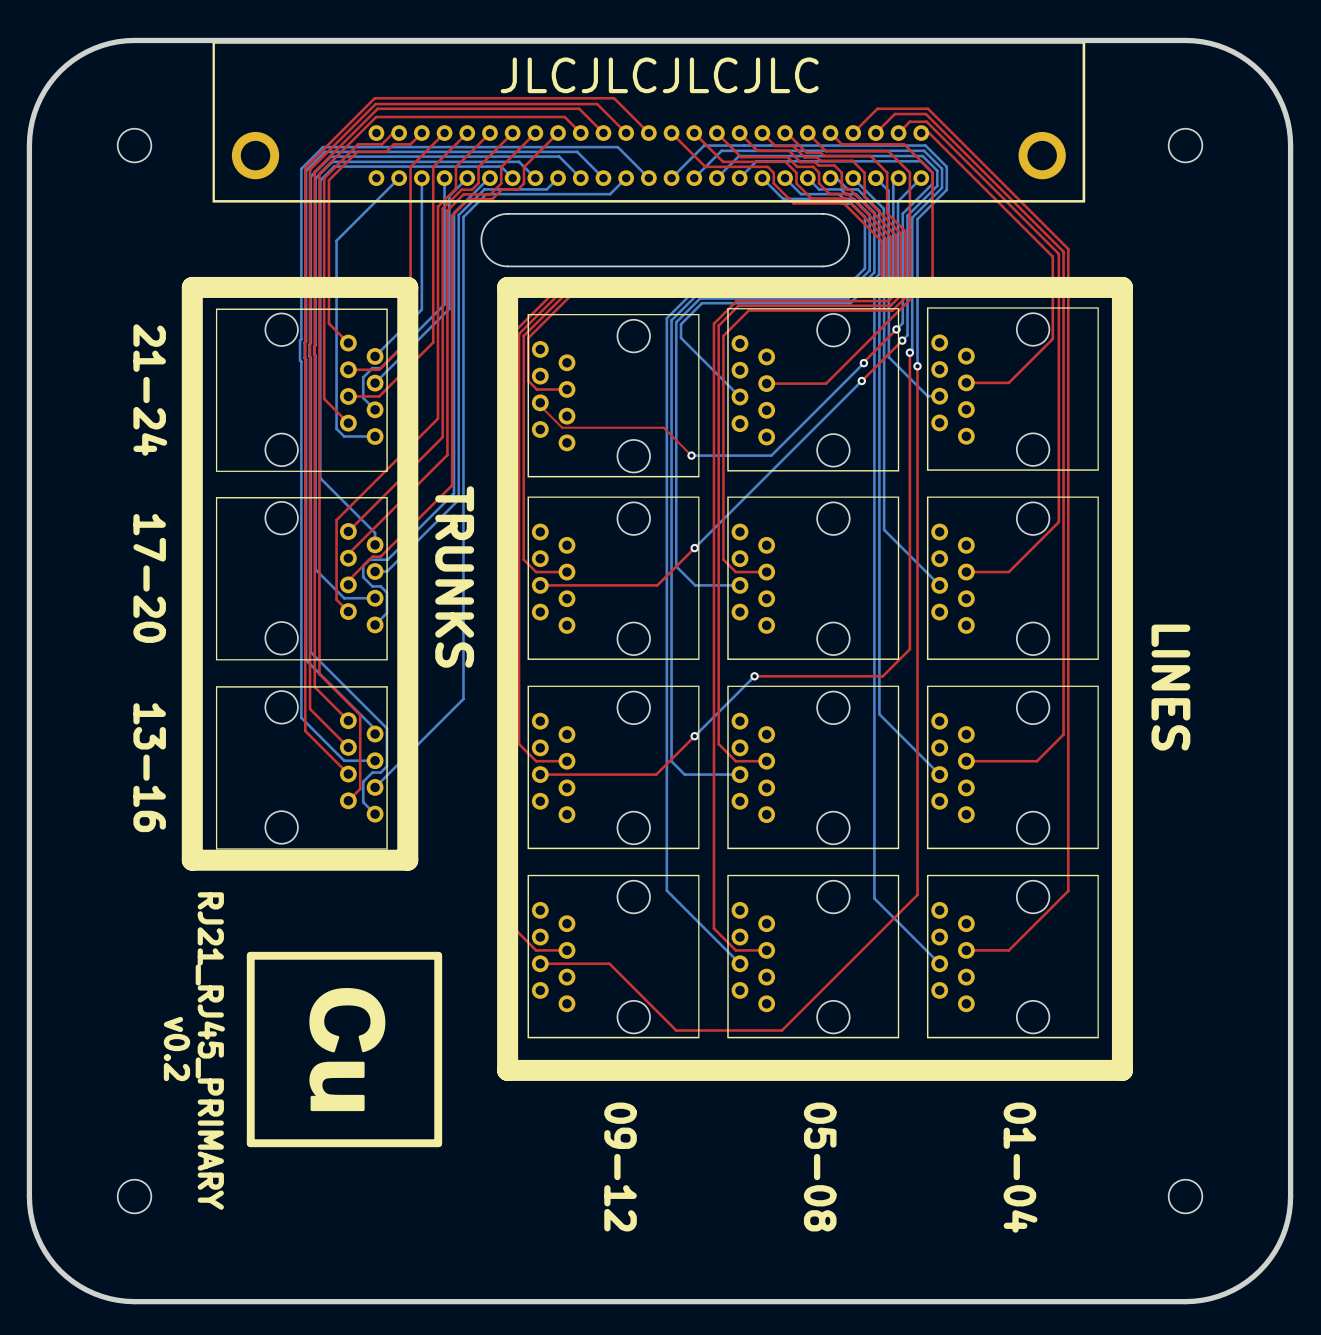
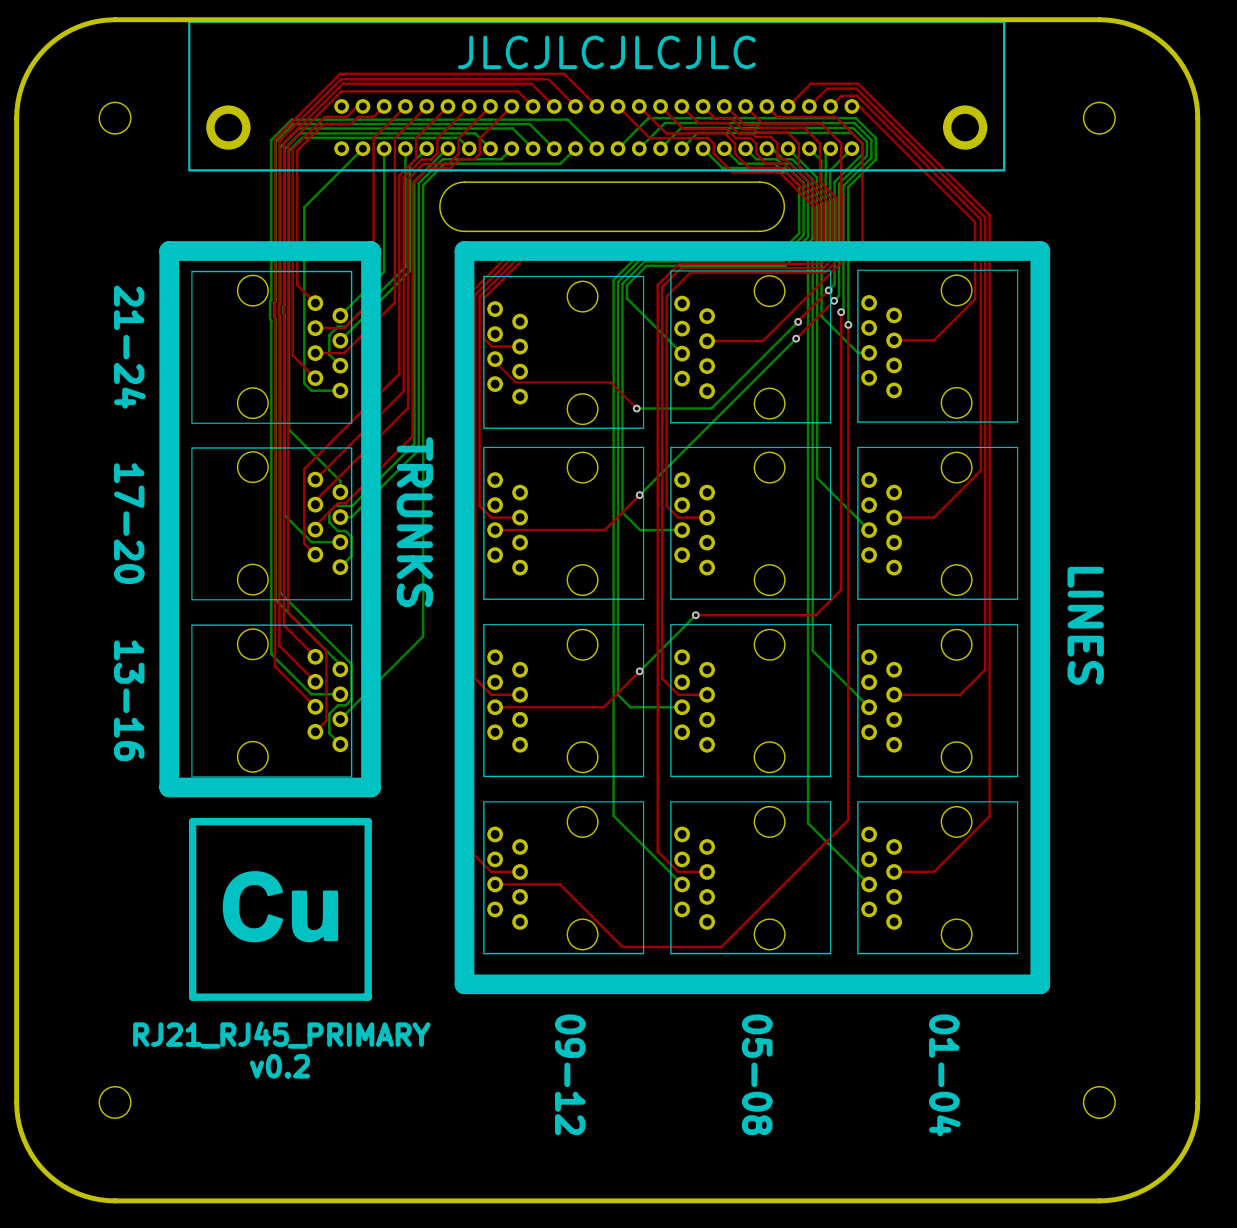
drawing: none -> [222, 871, 339, 943]
line: (250, 955) (250, 1143) (438, 1143) (438, 955) (250, 955) -> (192, 821) (192, 997) (368, 997) (368, 821) (192, 821)
drawing: [309, 988, 386, 1112] -> none
text rotation: 0° (176, 1049) -> 90° counterclockwise (279, 1066)
text position: v0.2 (176, 1049) -> v0.2 (279, 1066)
text rotation: 0° (210, 1051) -> 90° counterclockwise (281, 1035)

